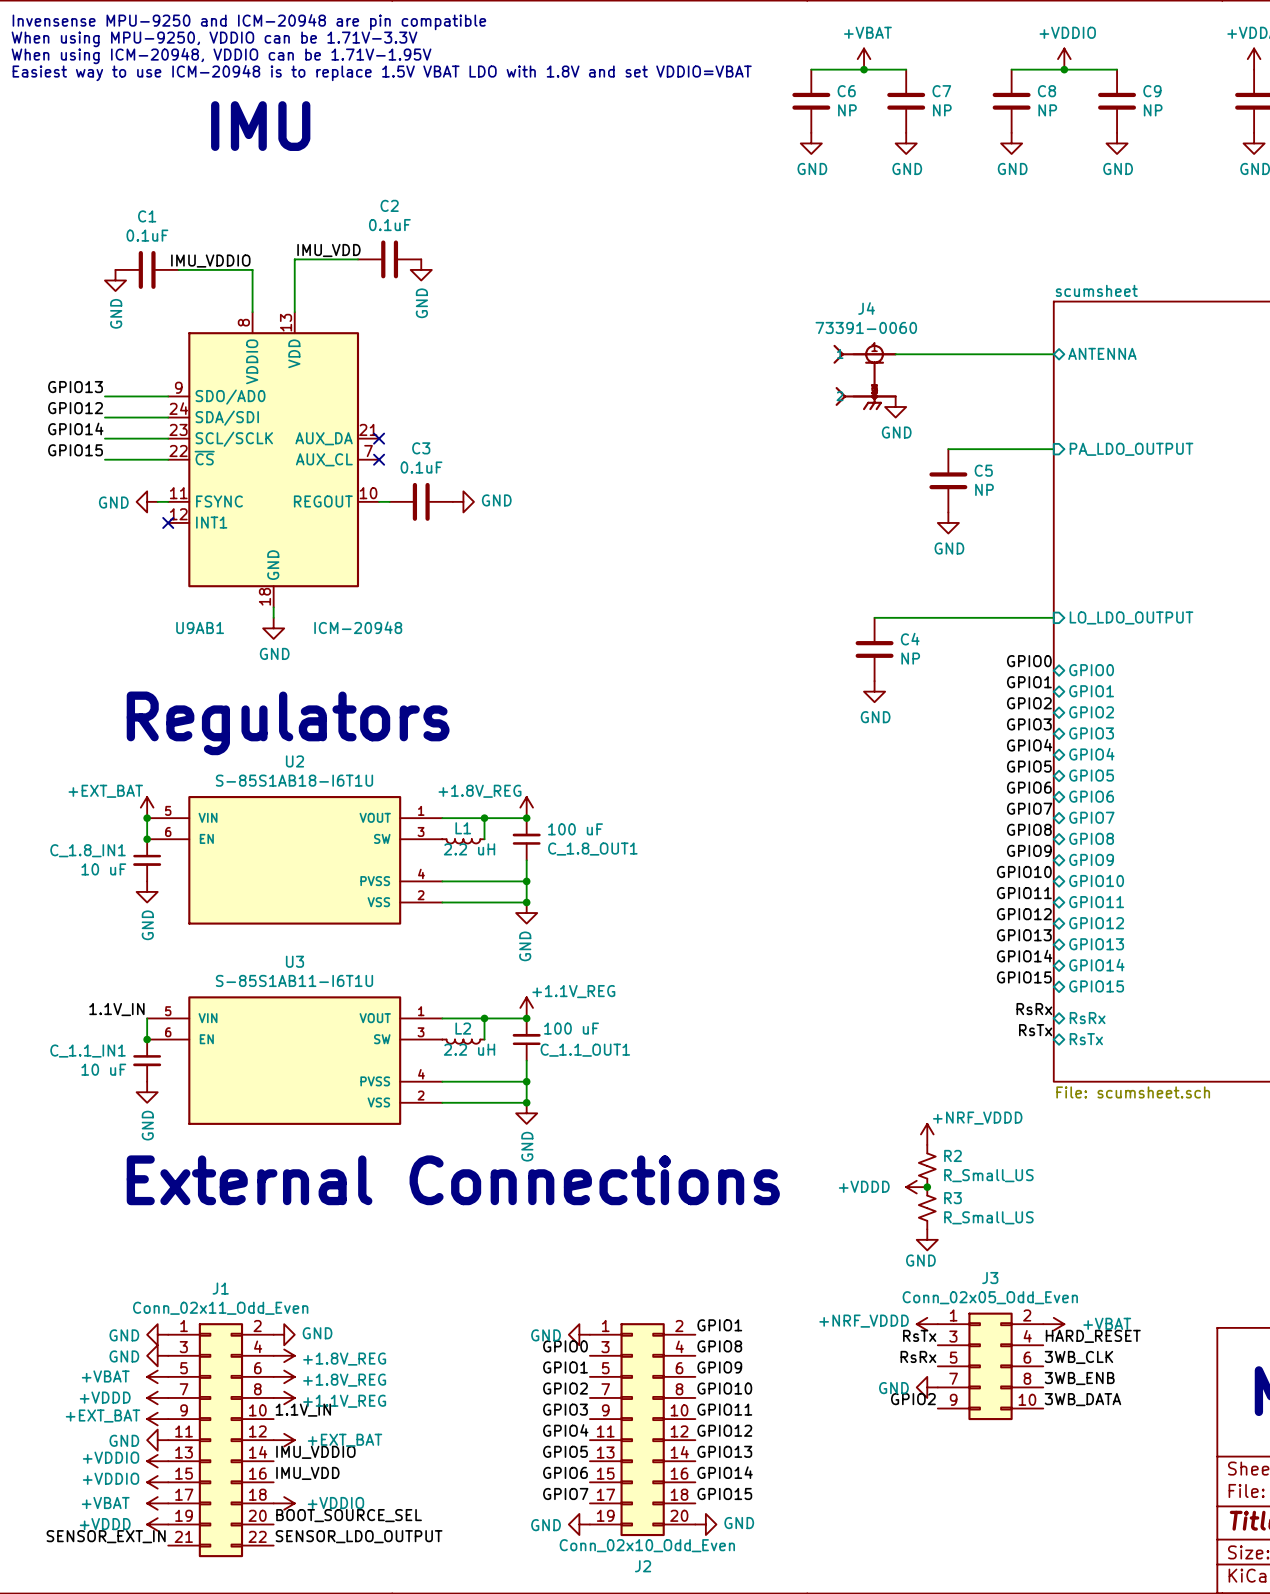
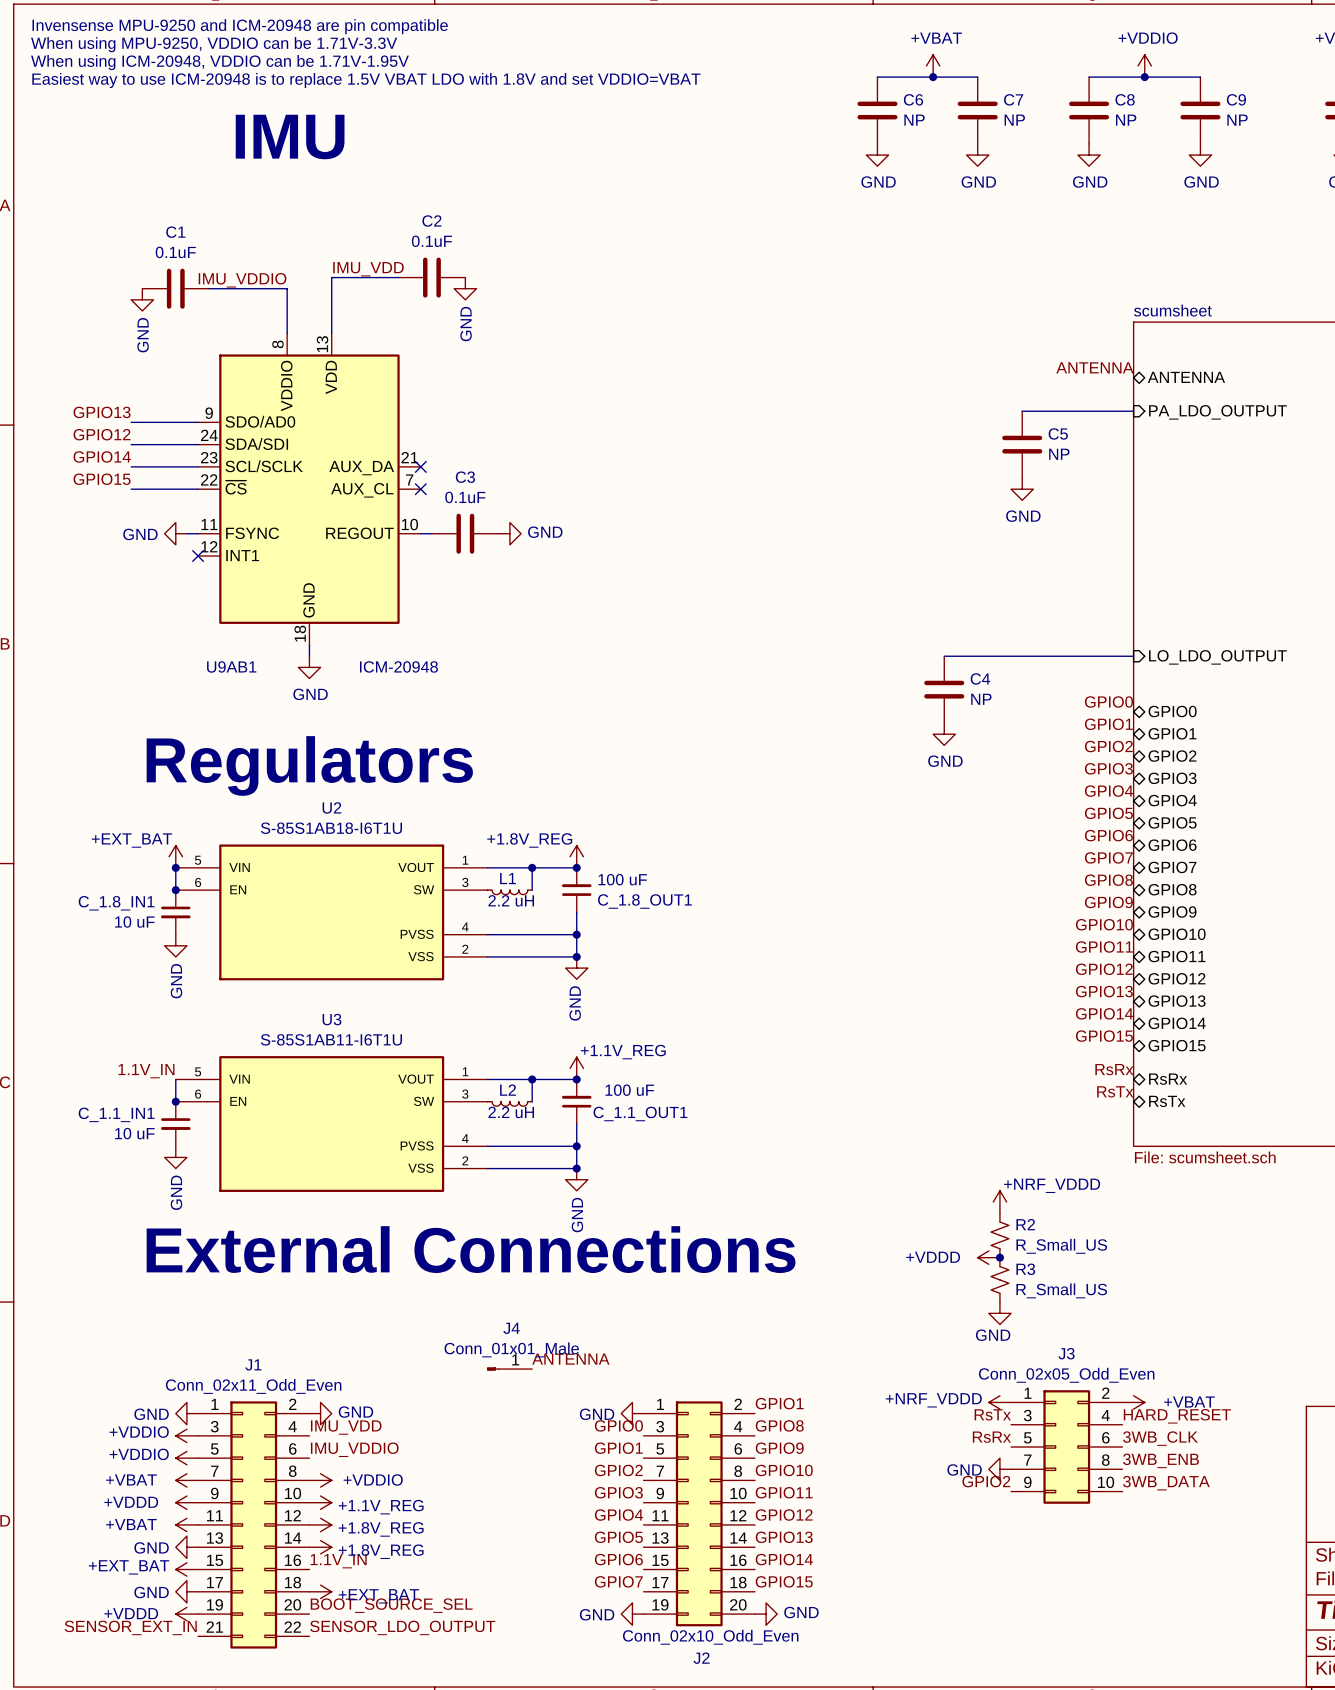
J4 name position: J4 (866, 308) -> J4 (511, 1328)
J4 value: 73391-0060 (866, 327) -> Conn_01x01_Male (511, 1349)
J4 symbol: [833, 344, 897, 411] -> [486, 1367, 533, 1371]
label: none -> ANTENNA (1094, 367)
wire: (895, 354) (1053, 354) -> none
power symbol: GND (895, 407) -> none
wire: (948, 449) (1053, 449) -> (1022, 411) (1133, 411)
sheet pin position: PA_LDO_OUTPUT (1131, 449) -> PA_LDO_OUTPUT (1217, 412)
power symbol: none -> GND (1022, 489)
C5 position: (948, 480) -> (1022, 444)
power symbol: GND (948, 522) -> none
label: none -> ANTENNA (570, 1359)
label: none -> IMU_VDD (346, 1427)
power symbol: GND (157, 1355) -> +VDDIO (186, 1435)
power symbol: +1.8V_REG (284, 1355) -> none
power symbol: +VBAT (157, 1376) -> +VDDIO (186, 1458)
power symbol: +1.8V_REG (284, 1376) -> none
power symbol: +VDDD (157, 1397) -> +VBAT (186, 1480)
power symbol: +1.1V_REG (284, 1397) -> +VDDIO (320, 1480)
label: 1.1V_IN (303, 1410) -> none
power symbol: +EXT_BAT (157, 1419) -> +VDDD (186, 1502)
power symbol: none -> +1.1V_REG (320, 1502)
power symbol: GND (157, 1440) -> +VBAT (186, 1524)
power symbol: +EXT_BAT (284, 1440) -> +1.8V_REG (320, 1524)
label position: IMU_VDDIO (315, 1452) -> IMU_VDDIO (354, 1449)
power symbol: +VDDIO (157, 1461) -> GND (186, 1547)
power symbol: none -> +1.8V_REG (320, 1547)
label: IMU_VDD (307, 1473) -> 1.1V_IN (338, 1561)
power symbol: +VDDIO (157, 1482) -> +EXT_BAT (186, 1569)
power symbol: +VBAT (157, 1503) -> GND (186, 1591)
power symbol: +VDDIO (284, 1503) -> +EXT_BAT (320, 1591)

